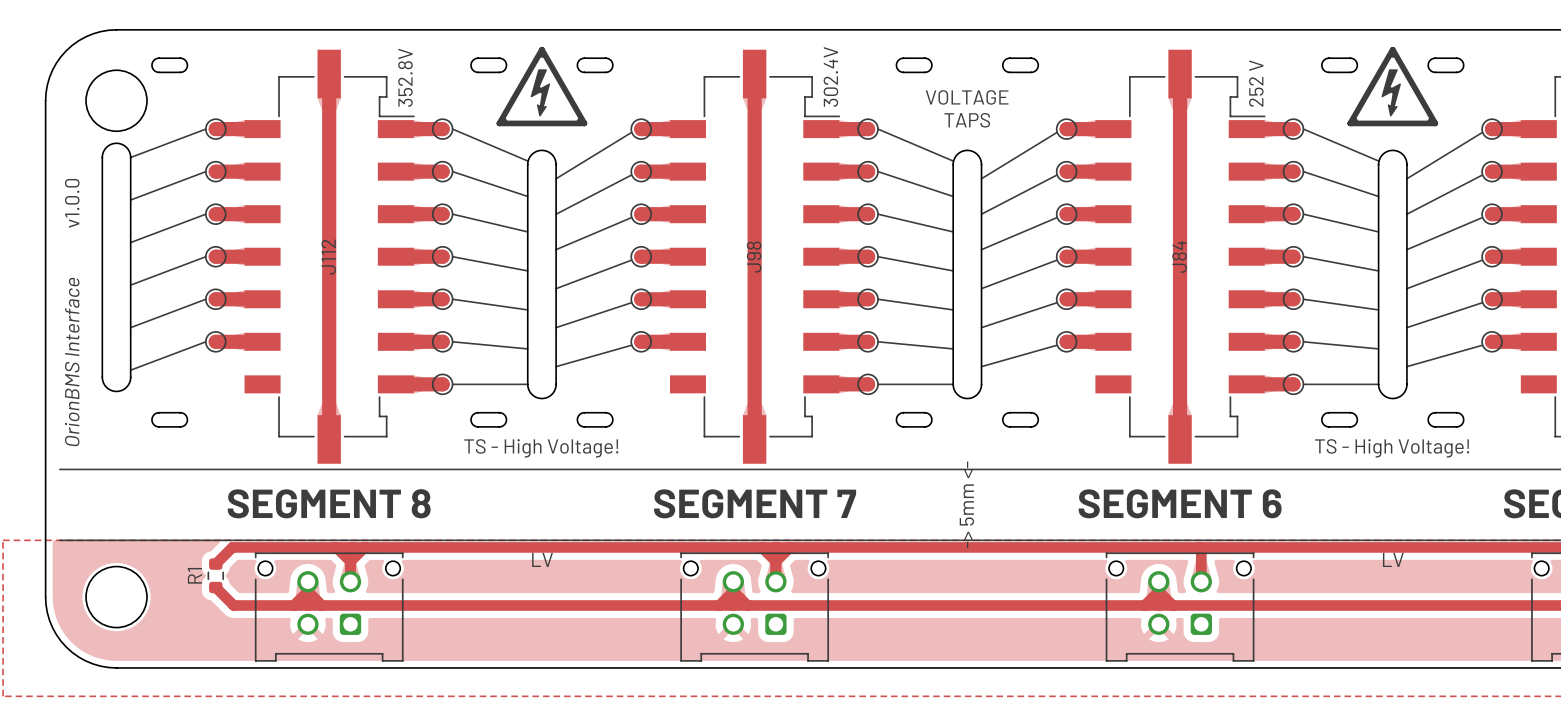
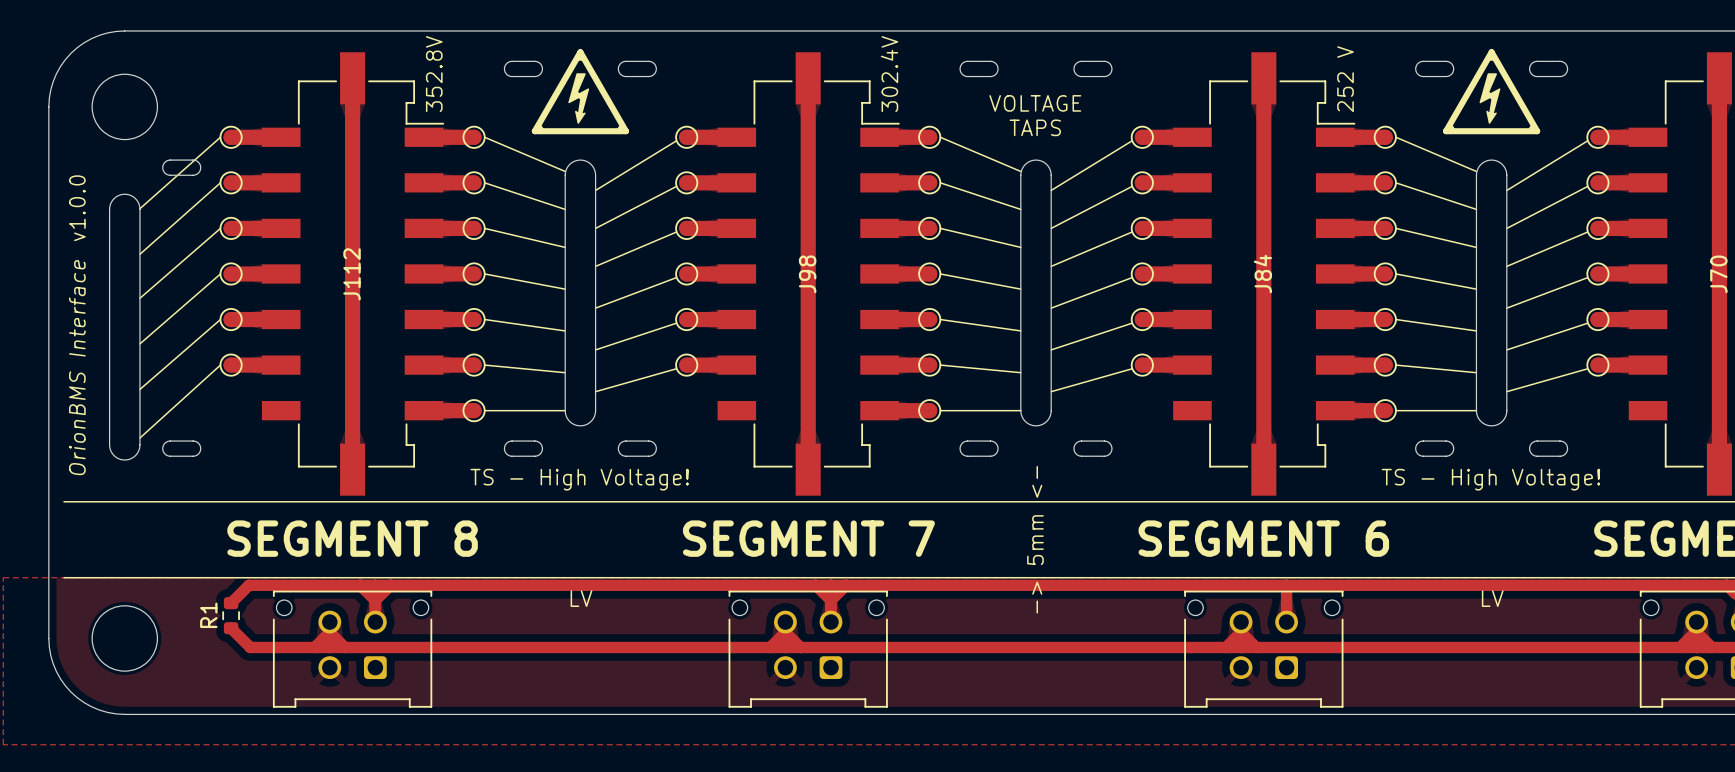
board edge: (159, 58) (182, 58) (186, 61) (187, 67) (181, 72) (157, 72) (152, 68) (152, 64) (154, 59) (159, 58) -> (170, 160) (195, 160) (199, 163) (200, 169) (194, 175) (168, 175) (163, 171) (162, 166) (165, 161) (170, 160)
line: (205, 129) (130, 157) -> (220, 137) (139, 208)
line: (205, 171) (130, 200) -> (220, 182) (139, 254)
board edge: (102, 196) (102, 153) (107, 146) (116, 143) (125, 146) (130, 153) (130, 196) -> (109, 209) (114, 198) (124, 194) (135, 198) (139, 209)
line: (205, 214) (130, 242) -> (220, 228) (139, 298)
line: (205, 256) (130, 285) -> (220, 273) (139, 343)
line: (205, 299) (130, 327) -> (220, 319) (139, 389)
line: (205, 341) (130, 370) -> (220, 365) (139, 438)
board edge: (102, 377) (106, 387) (116, 391) (126, 387) (130, 377) -> (109, 403) (110, 448) (115, 456) (124, 460) (134, 456) (139, 448) (139, 403)

